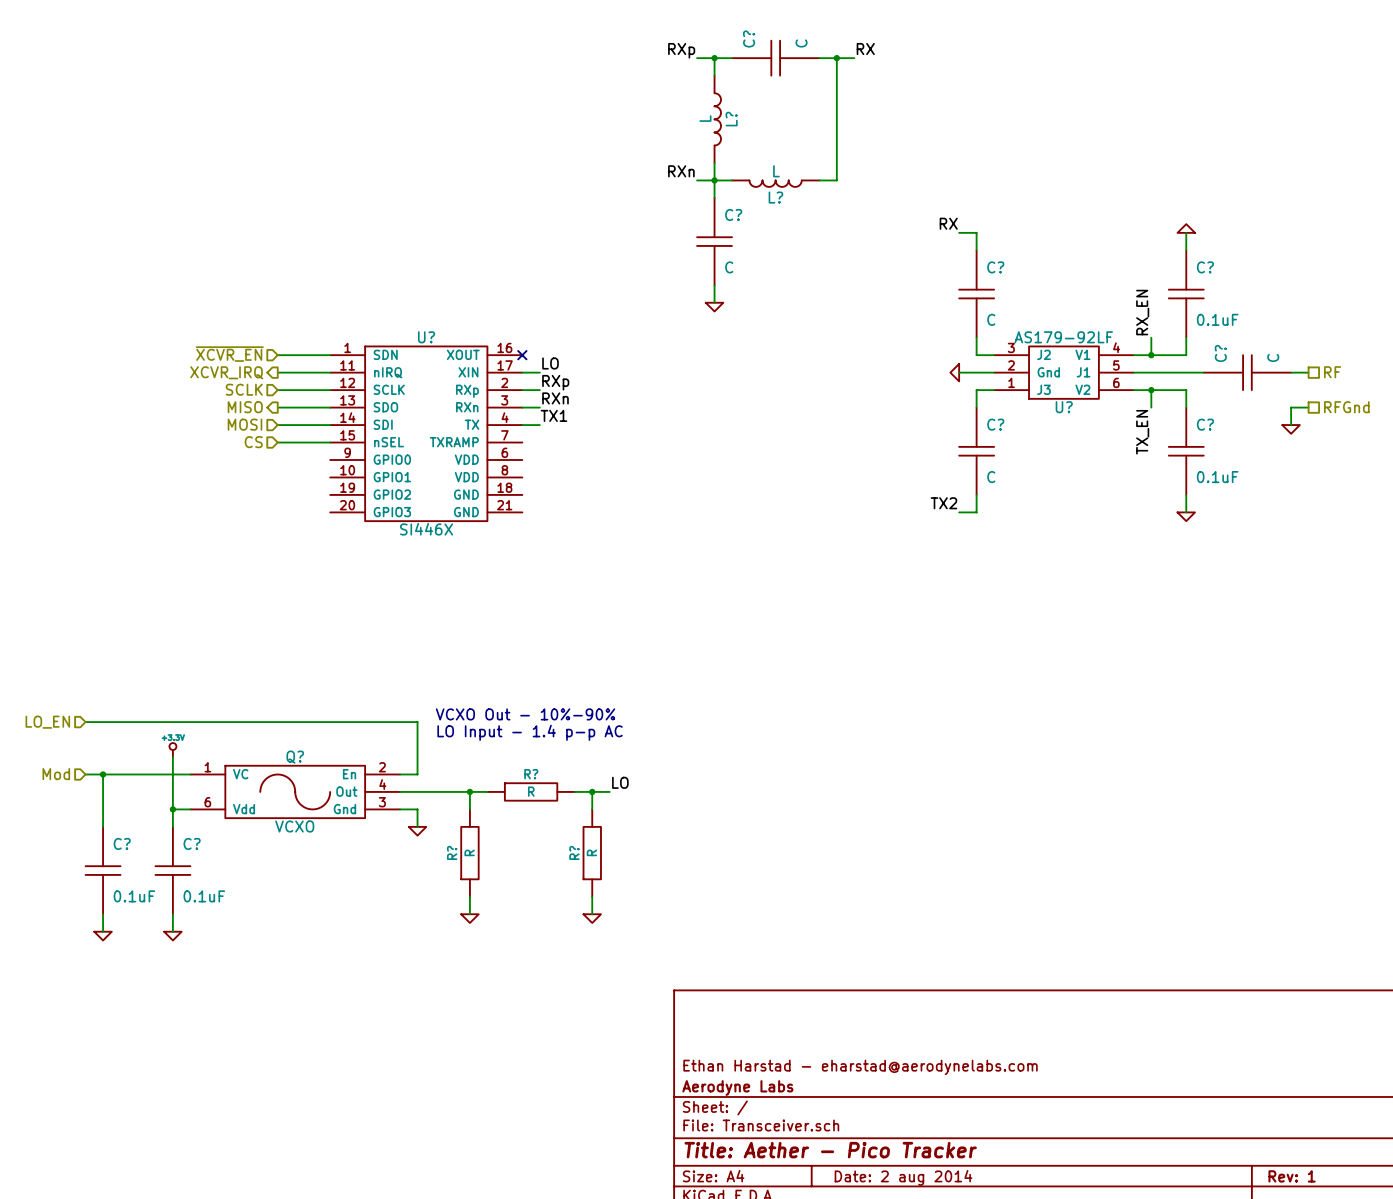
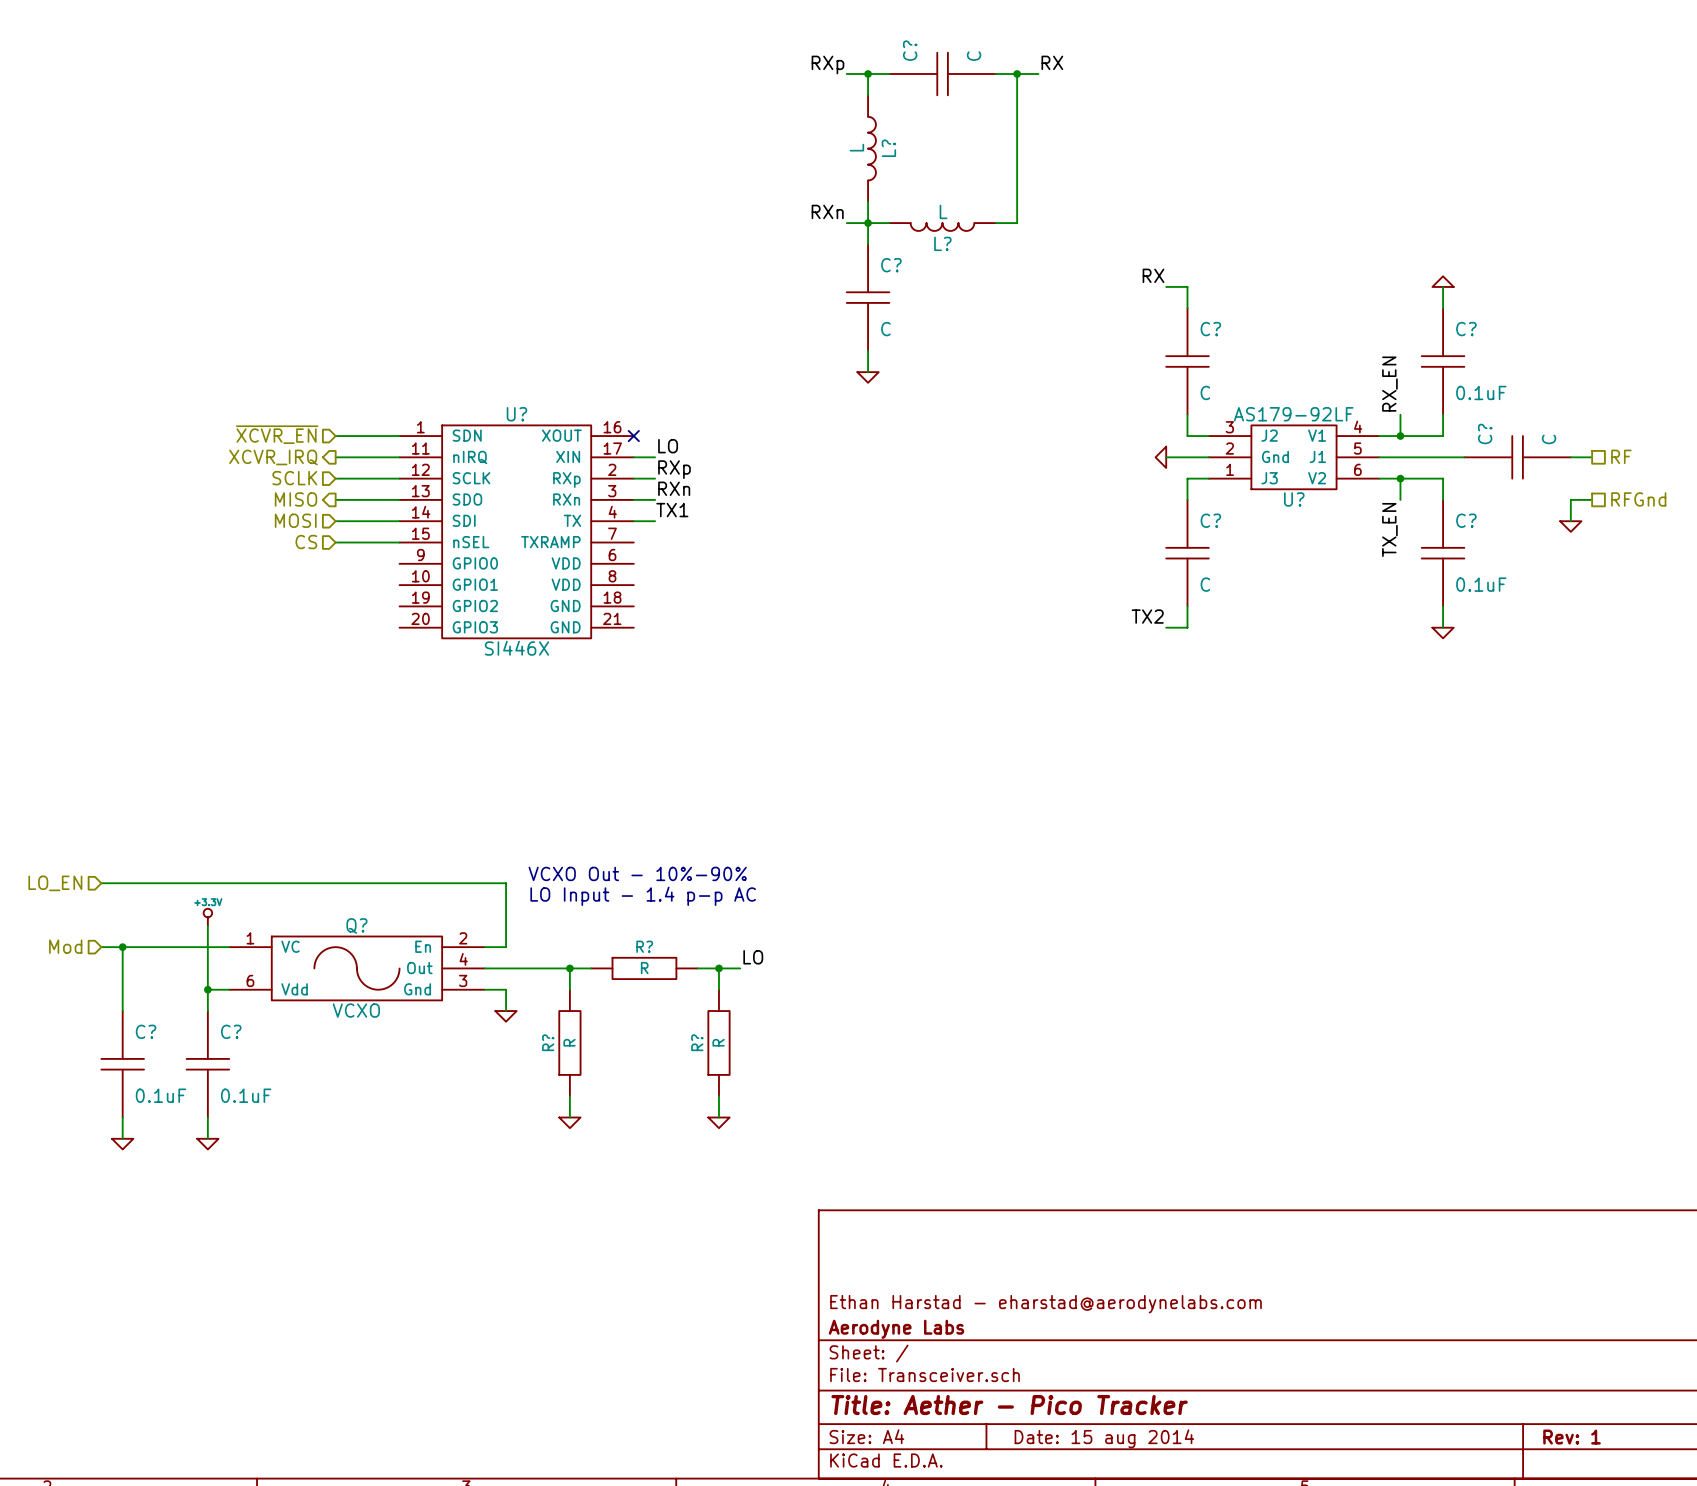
title block: Date: 2 aug 2014 (903, 1177) -> Date: 15 aug 2014 (1104, 1438)

